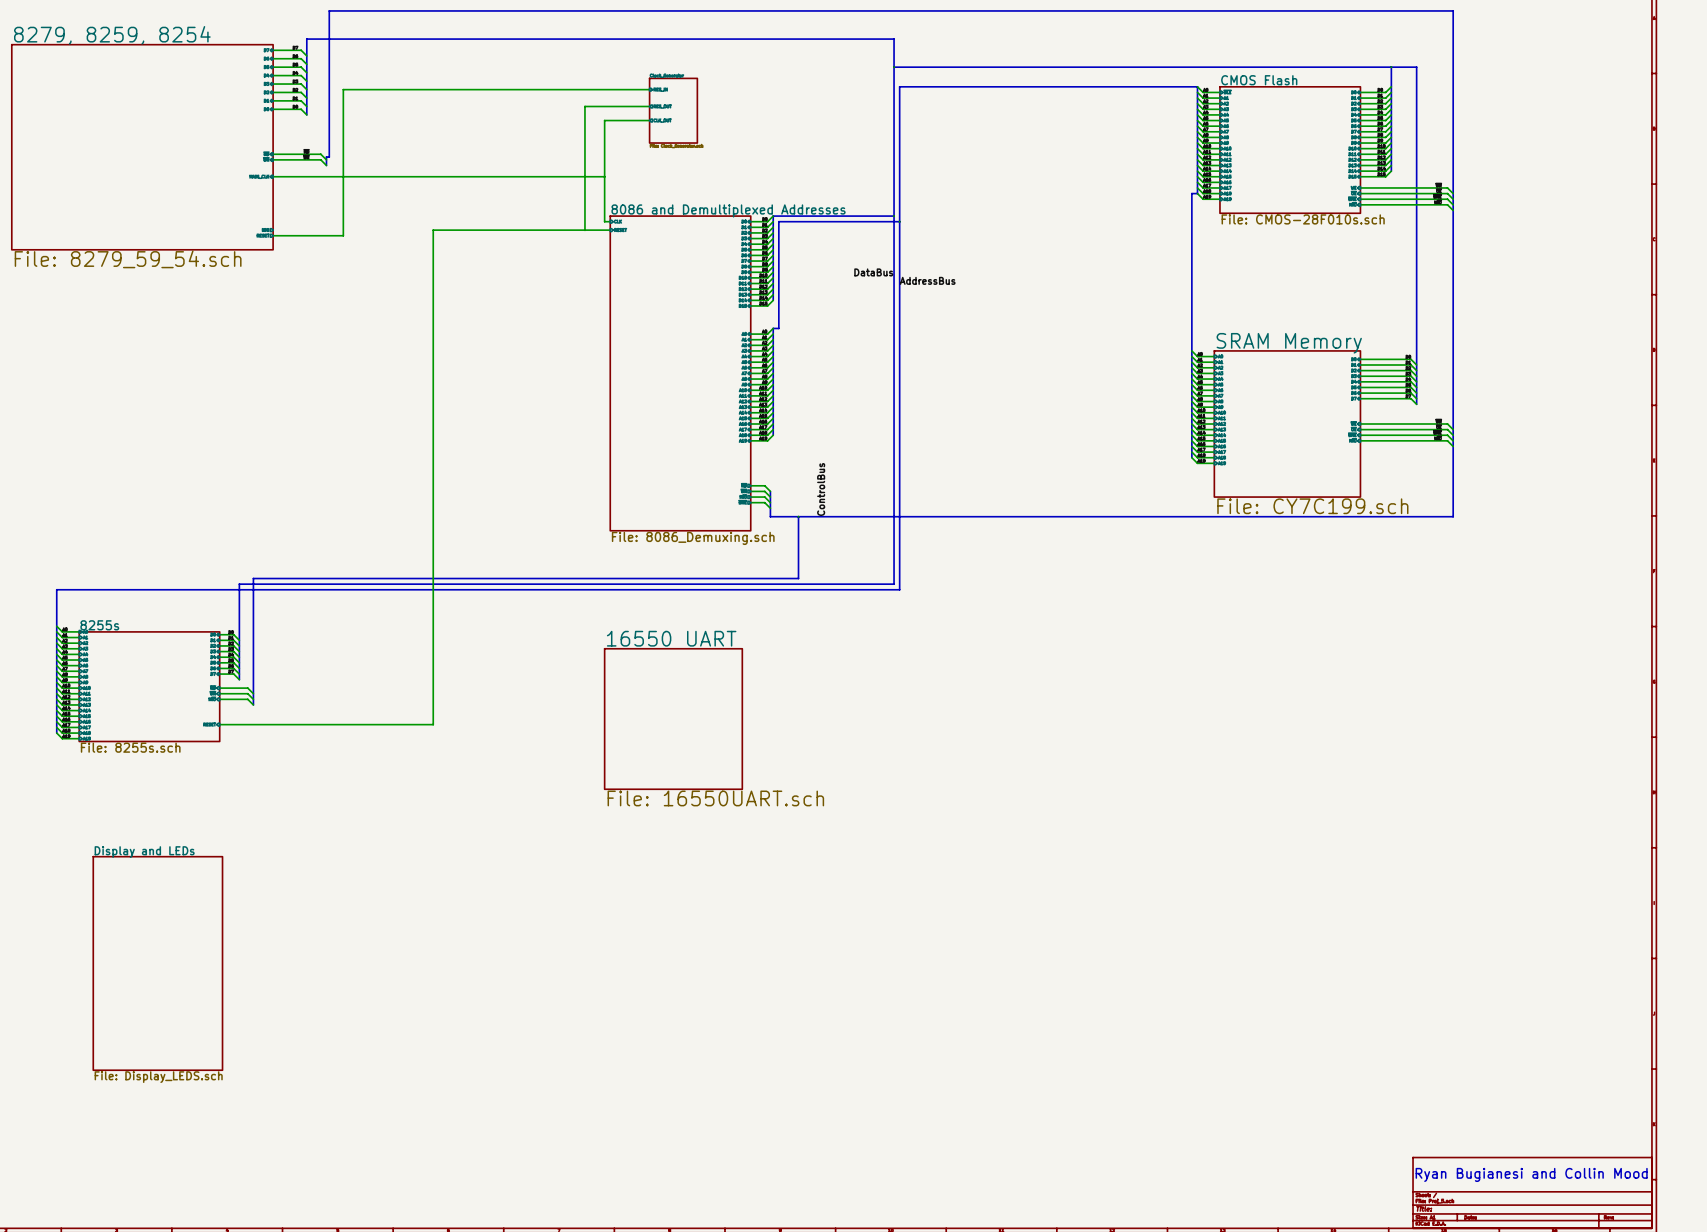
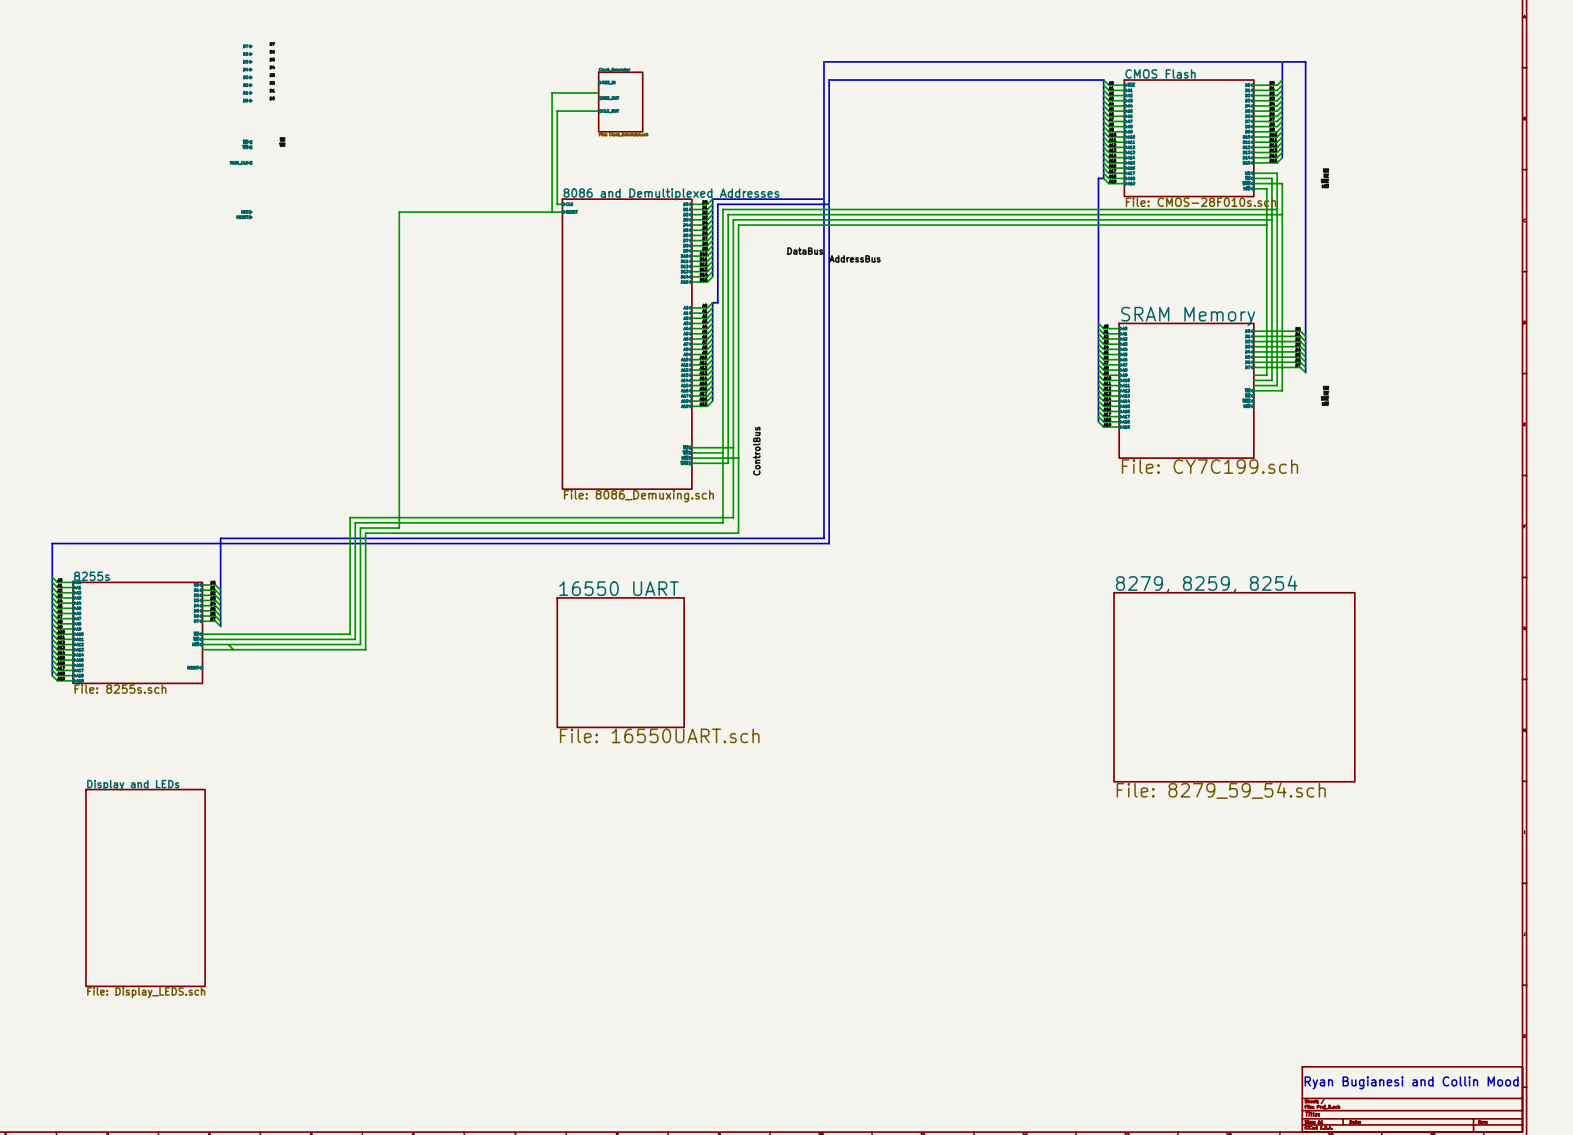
wire: (273, 50) (301, 50) (306, 55) -> none
wire: (273, 58) (301, 58) (306, 64) -> none
wire: (273, 67) (301, 67) (306, 72) -> none
bus: (894, 67) (894, 39) (306, 39) (306, 114) -> none
wire: (273, 75) (301, 75) (306, 81) -> none
wire: (273, 84) (301, 84) (306, 89) -> none
wire: (649, 89) (343, 89) (343, 235) (273, 235) -> none
wire: (273, 92) (301, 92) (306, 98) -> none
wire: (273, 100) (301, 100) (306, 106) -> none
wire: none -> (598, 92) (552, 92) (552, 212)
wire: (649, 106) (584, 106) (584, 230) -> none
wire: (273, 109) (301, 109) (306, 114) -> none
sheet 8279, 8259, 8254 position: (142, 147) -> (1234, 687)
wire: (273, 154) (320, 154) (326, 159) -> none
wire: (273, 159) (320, 159) (326, 165) -> none
bus: (326, 165) (326, 157) (329, 157) (329, 10) (1453, 10) (1453, 516) (770, 516) (770, 491) -> none
wire: (273, 176) (604, 176) -> none
wire: (1385, 187) (1447, 187) (1453, 193) -> (1277, 173) (1277, 385) (1253, 385)
wire: (1380, 193) (1447, 193) (1453, 199) -> (1271, 178) (1271, 380) (1253, 380)
wire: (1391, 199) (1447, 199) (1453, 204) -> (1282, 183) (1282, 390)
wire: (1374, 204) (1447, 204) (1453, 210) -> (1266, 188) (1266, 375) (1253, 375)
wire: none -> (1266, 225) (738, 225) (738, 533) (365, 533) (365, 649) (202, 649)
wire: (1391, 423) (1447, 423) (1453, 429) -> none
wire: (1360, 429) (1447, 429) (1453, 435) -> none
wire: (1360, 435) (1447, 435) (1453, 440) -> none
wire: (1360, 440) (1447, 440) (1453, 446) -> none
wire: (764, 485) (770, 491) -> (704, 447) (733, 447)
wire: (764, 491) (770, 497) -> (704, 452) (722, 452)
wire: (764, 497) (770, 502) -> (704, 458) (738, 458)
wire: (764, 502) (770, 508) -> (704, 463) (728, 463) (728, 214) (1282, 214)
bus: (798, 516) (798, 578) (253, 578) (253, 704) -> none
junction: (798, 516) -> none
wire: (433, 572) (433, 724) (219, 724) -> (399, 528) (360, 528) (360, 644) (228, 644)
wire: (247, 688) (253, 693) -> (228, 634) (350, 634) (350, 517) (733, 517) (733, 219) (1271, 219)
wire: (247, 693) (253, 699) -> (228, 639) (355, 639) (355, 522) (722, 522) (722, 209) (1277, 209)

